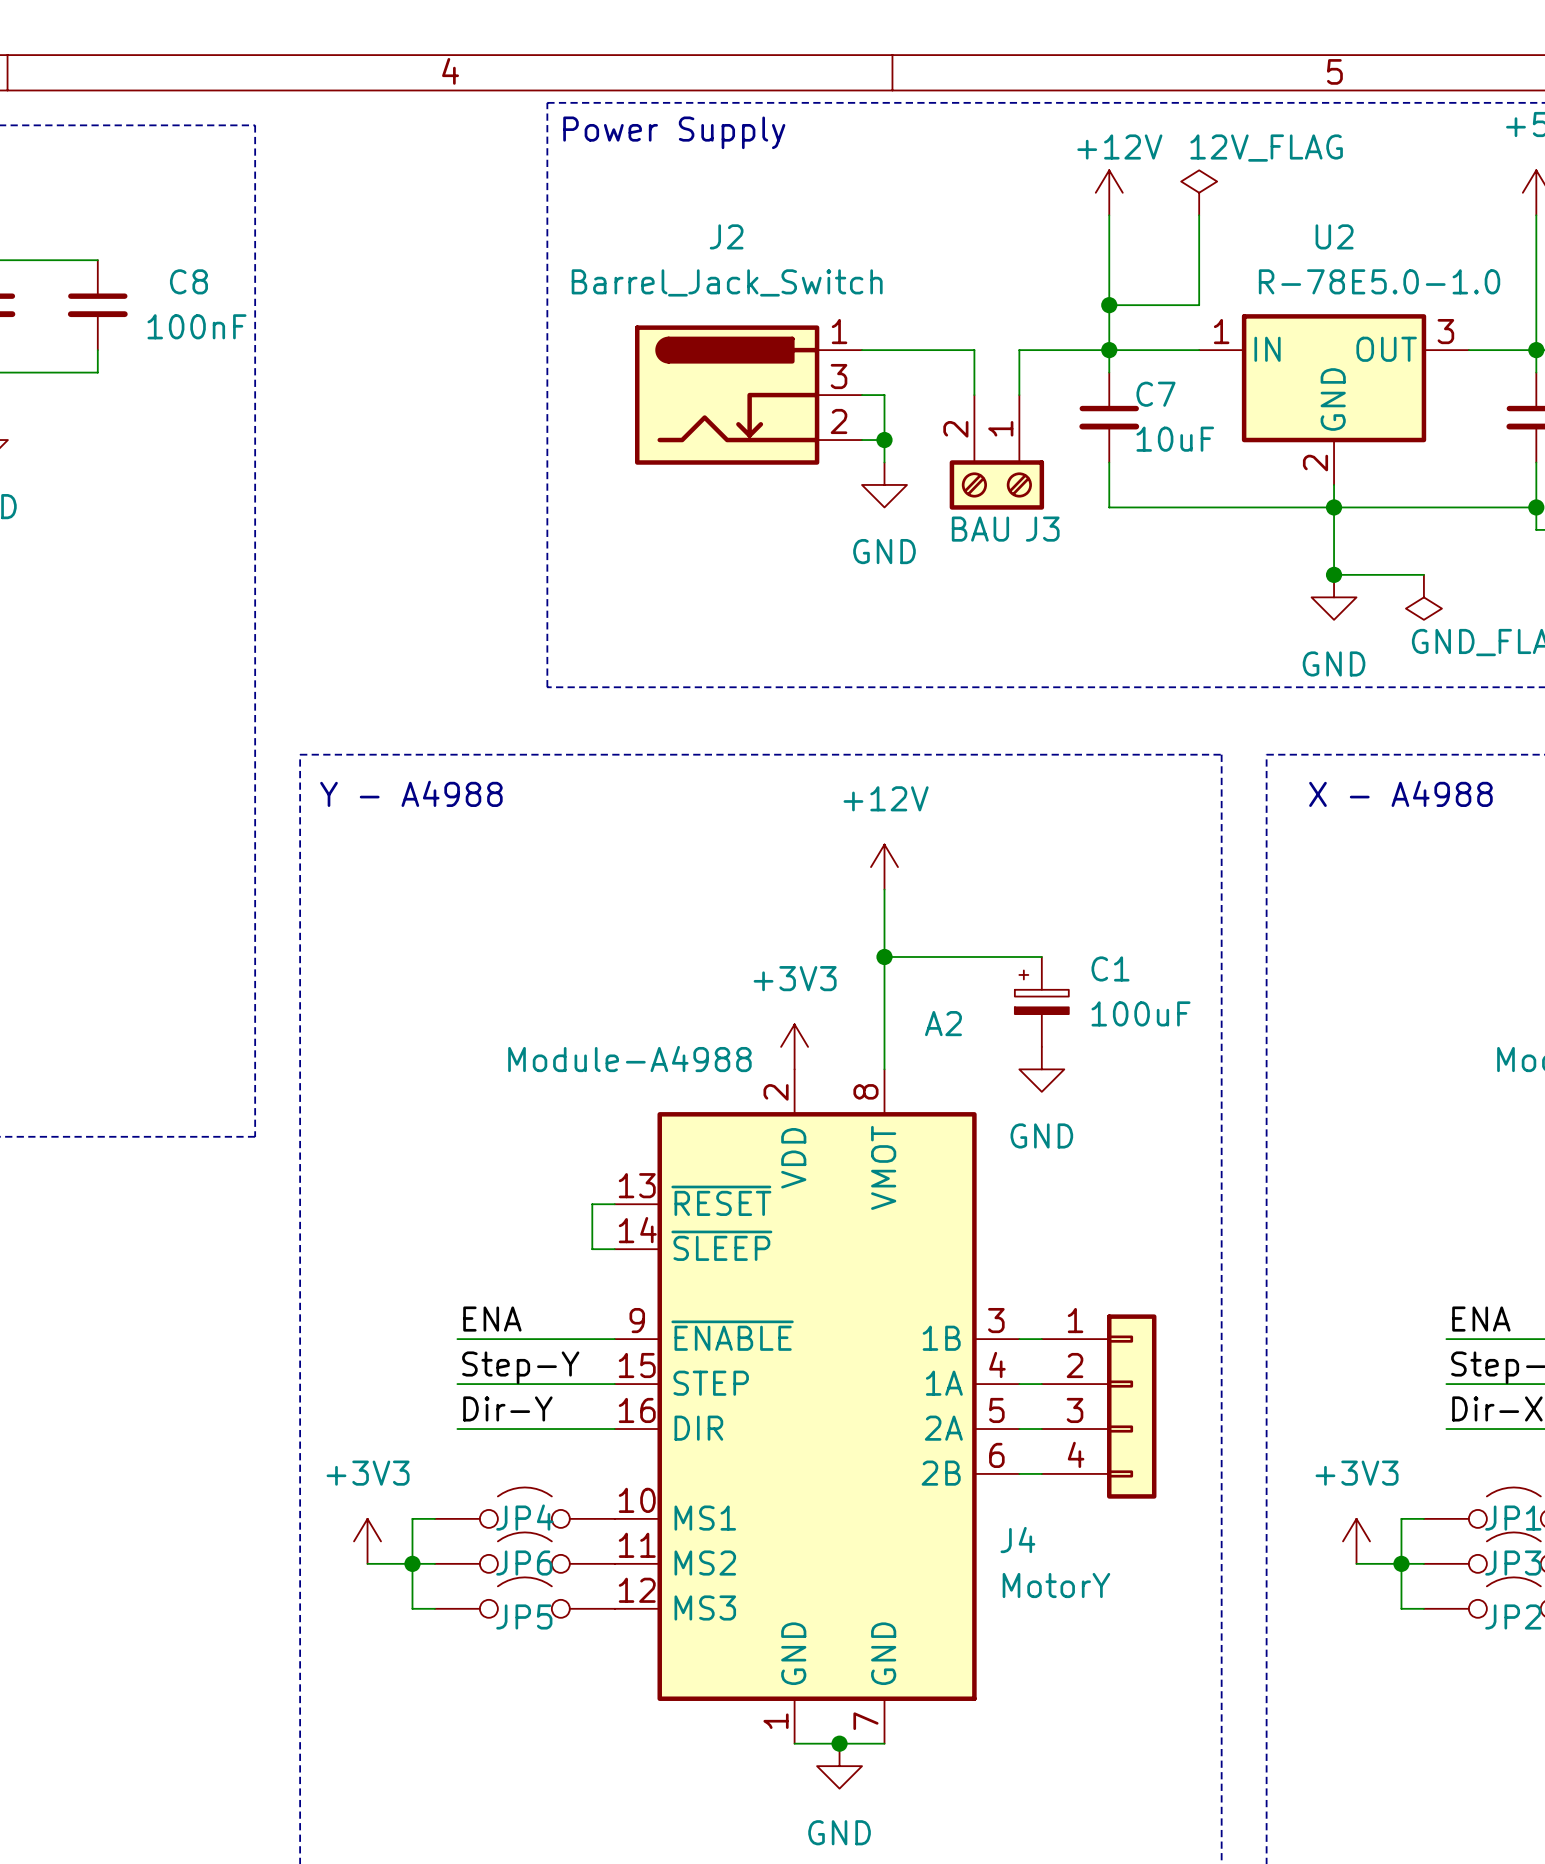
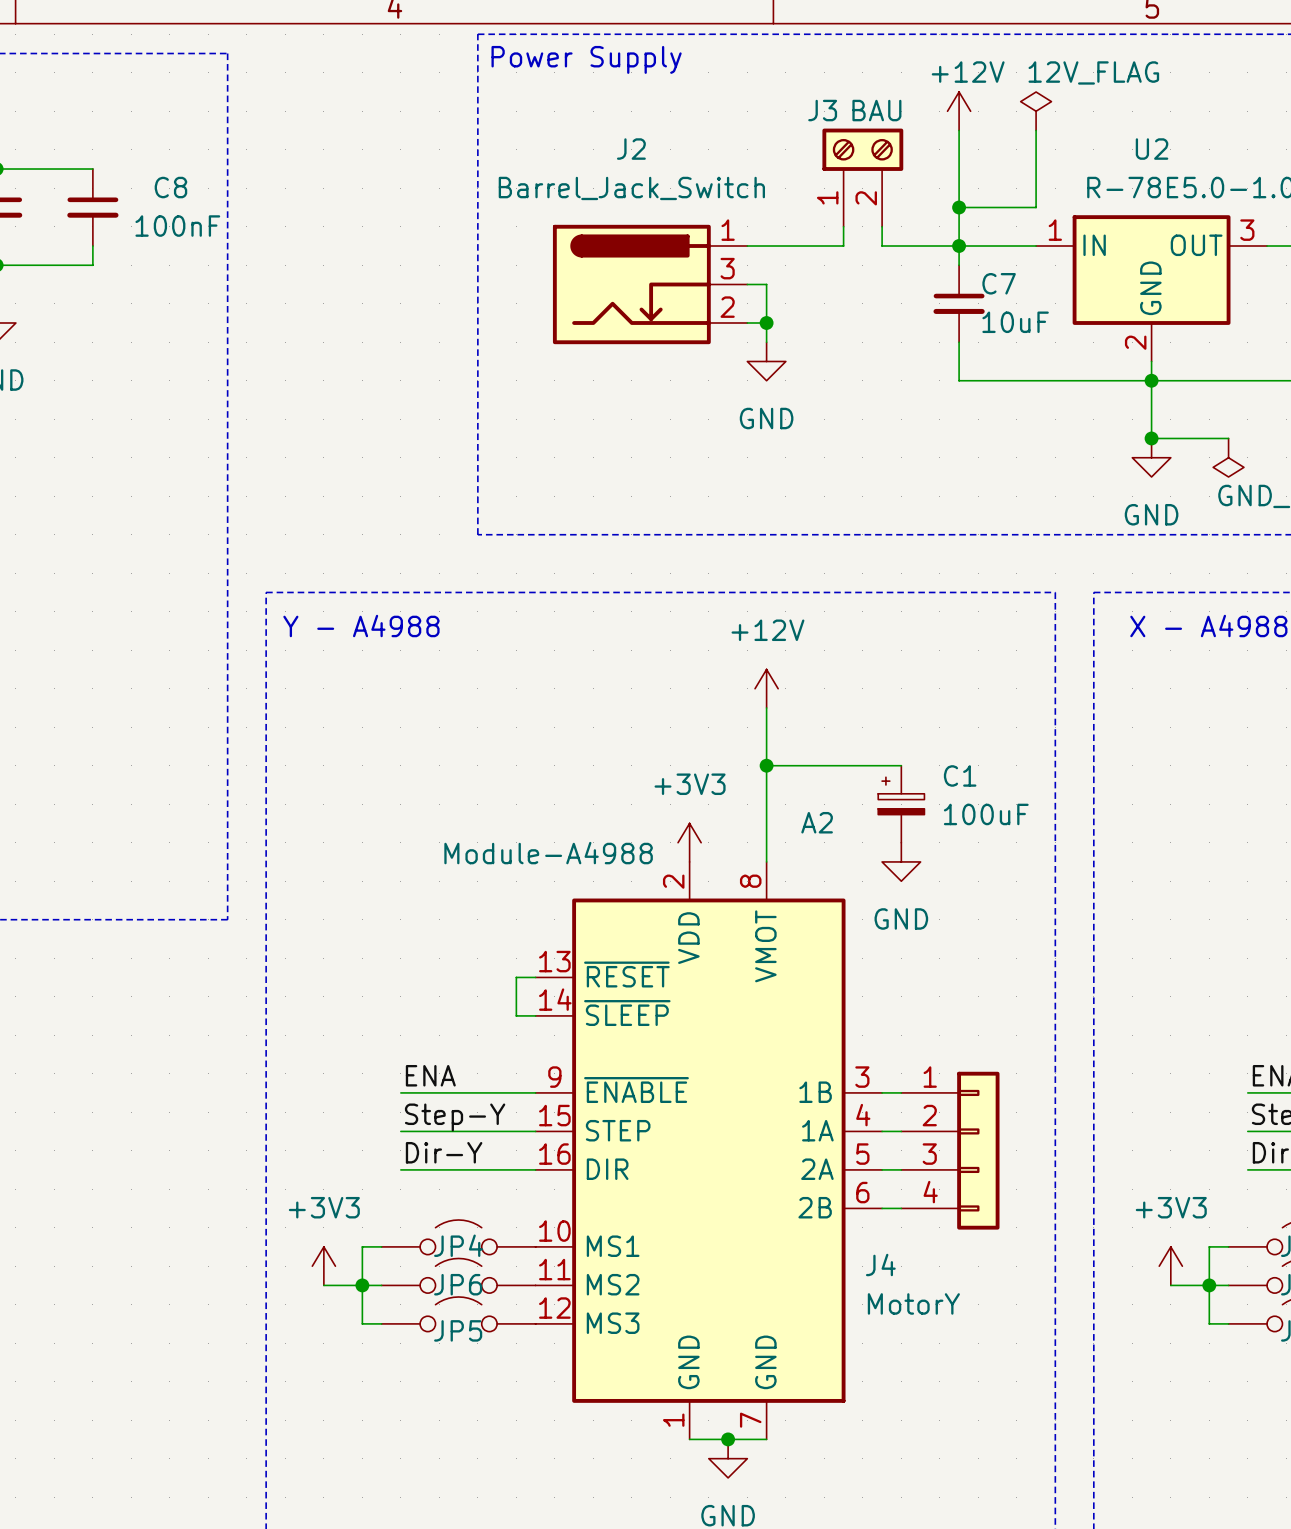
wire: (974, 350) (974, 395) -> (843, 246) (843, 226)
wire: (1019, 350) (1019, 395) -> (882, 246) (882, 226)
J3 position: (996, 452) -> (862, 177)
J3 rotation: 0° (996, 484) -> 180° (862, 149)

